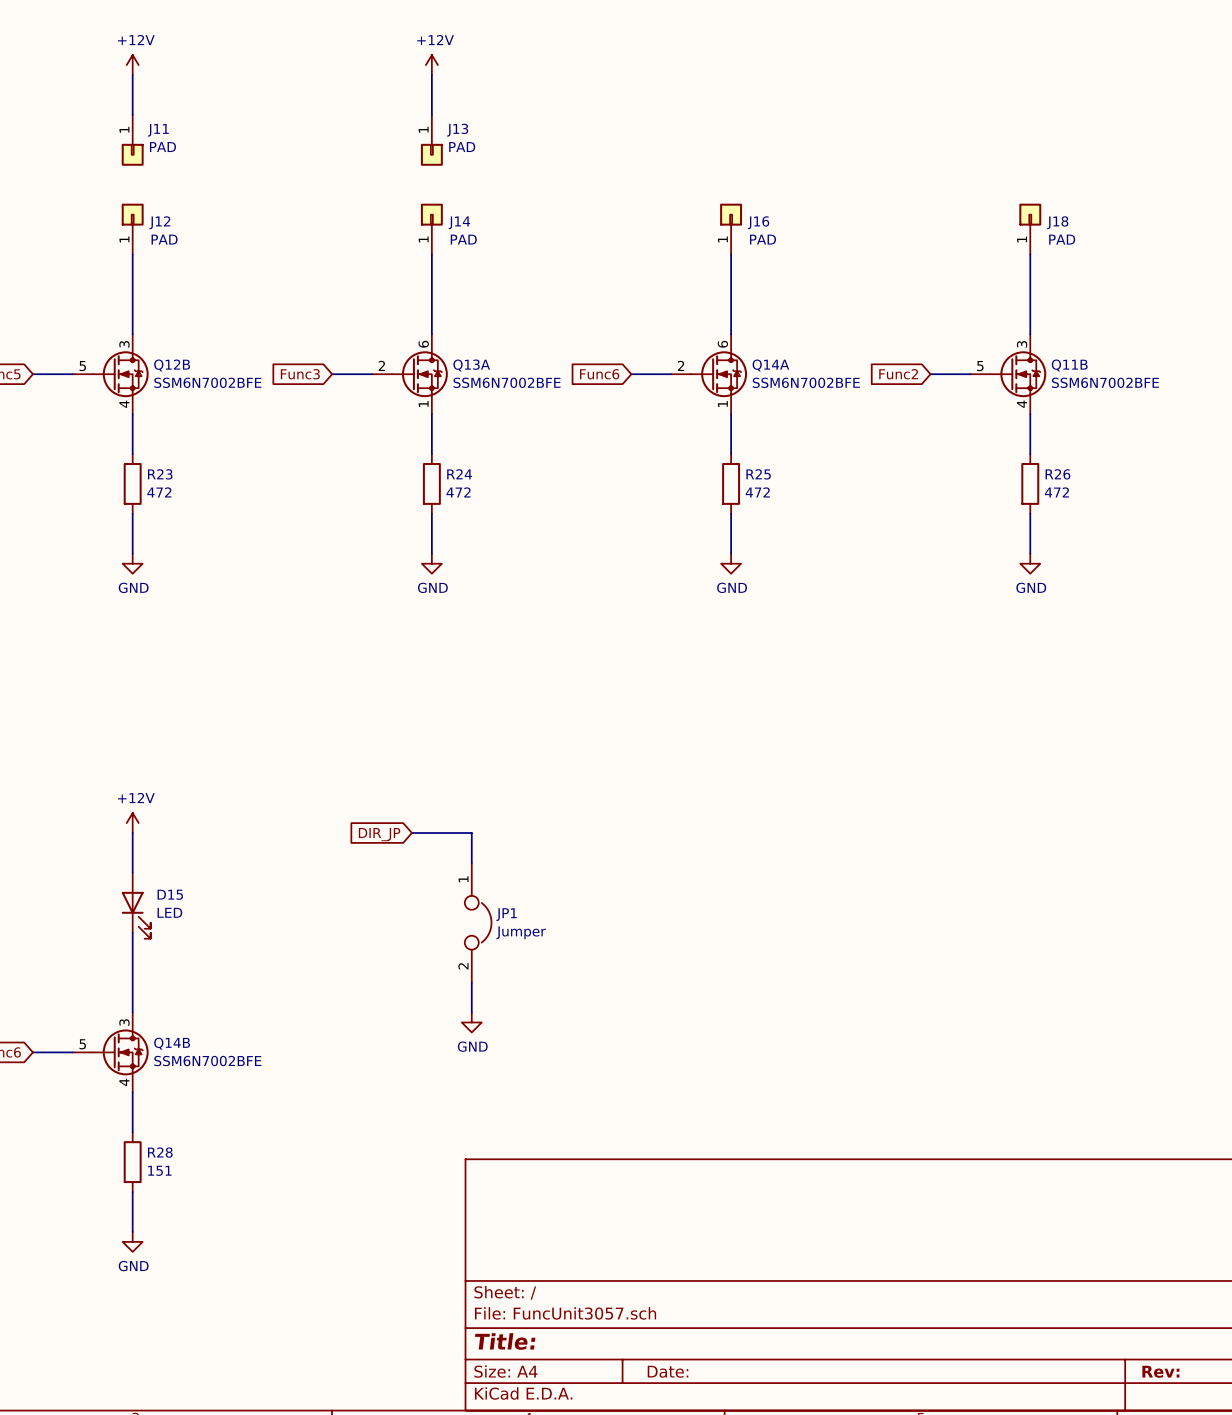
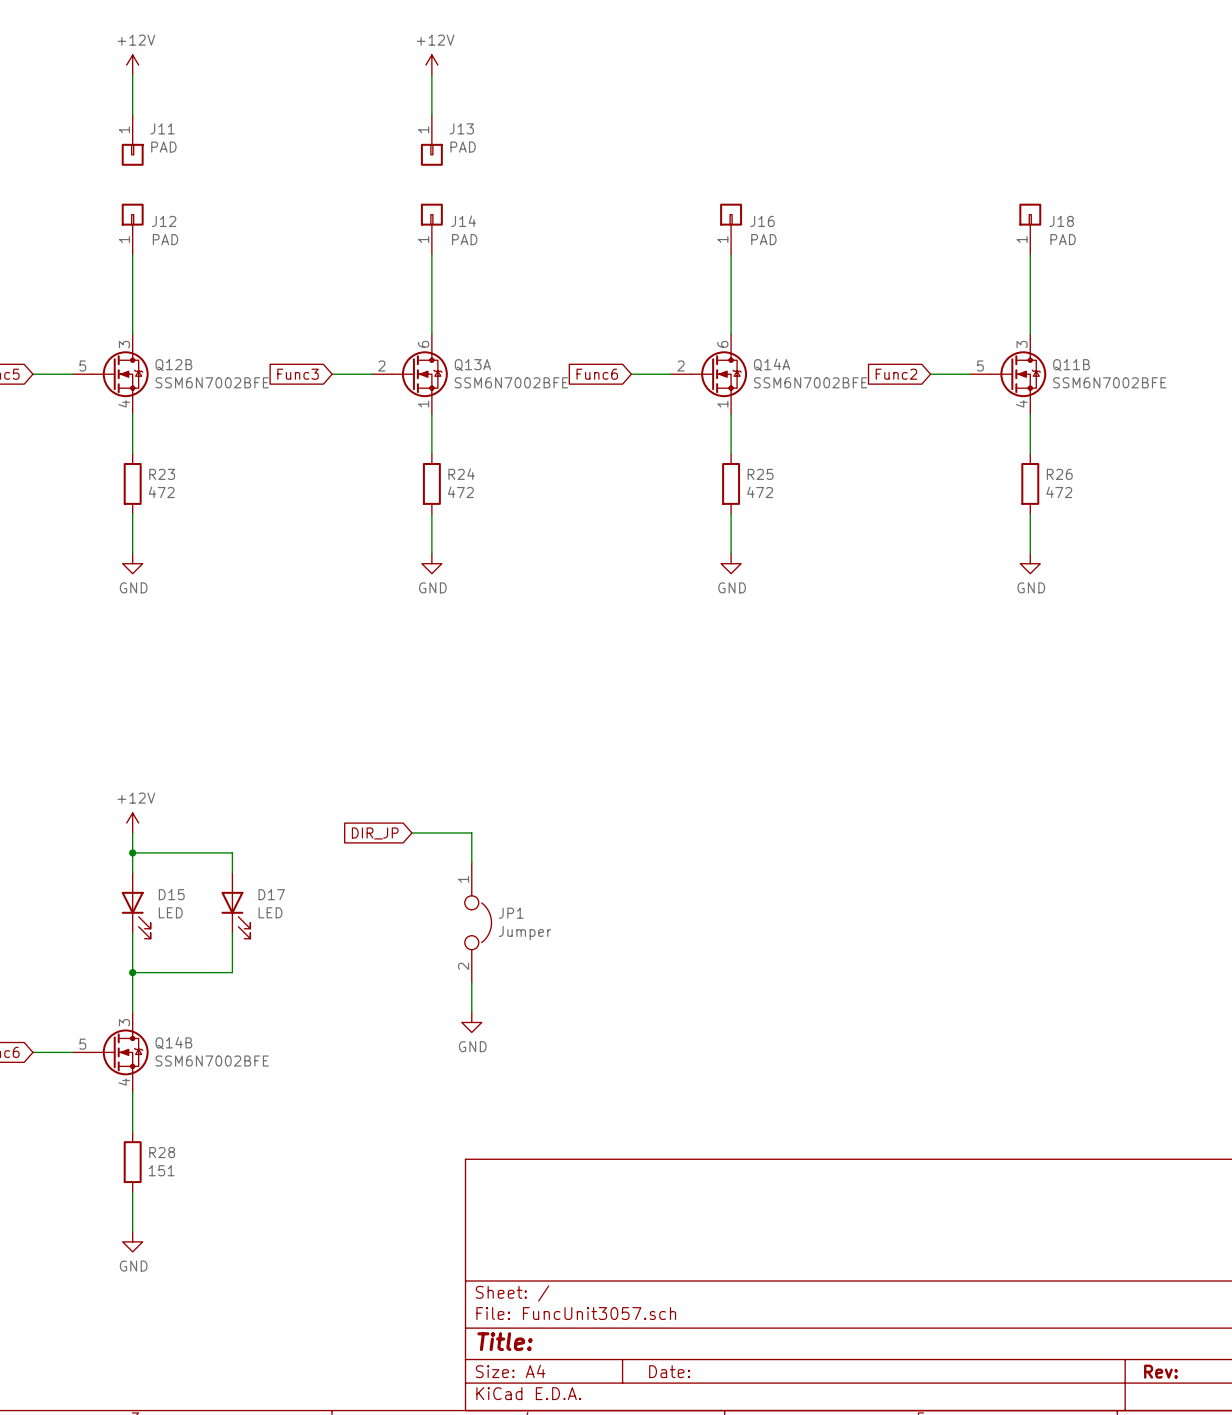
wire: none -> (132, 852) (232, 852) (232, 872)
junction: none -> (132, 852)
D17: none -> LED (235, 905)
wire: none -> (232, 932) (232, 972) (132, 972)
junction: none -> (132, 972)

